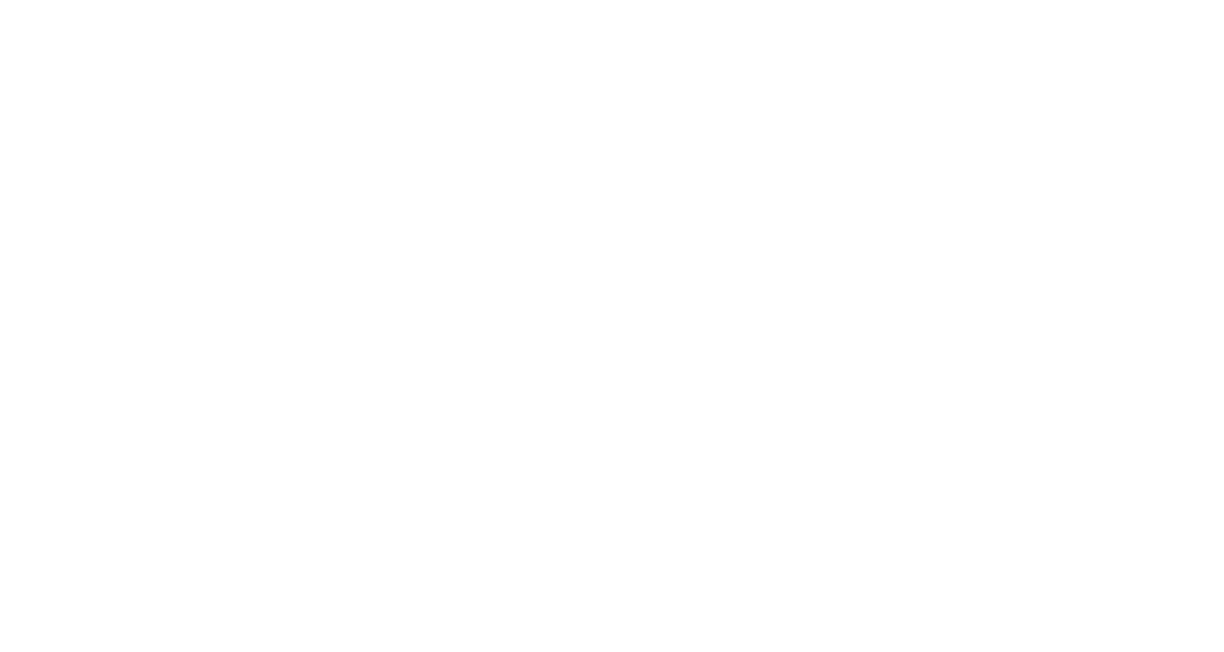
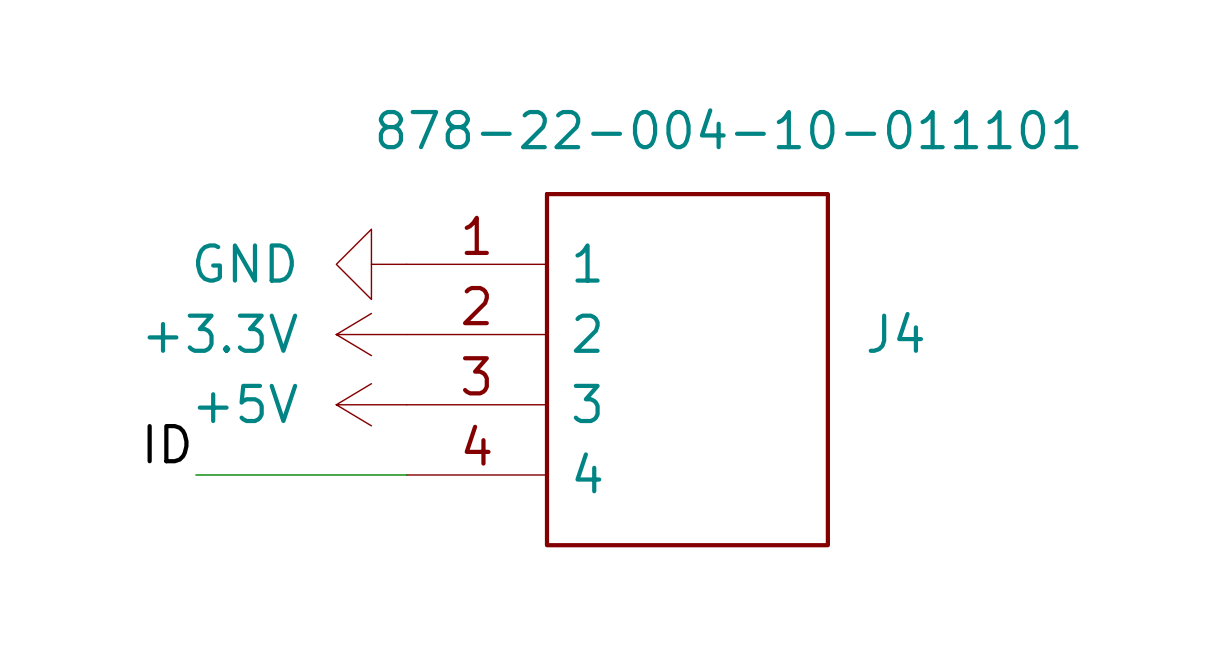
power symbol: none -> GND (371, 264)
power symbol: none -> +3.3V (371, 334)
J4: none -> 878-22-004-10-011101 (618, 369)
power symbol: none -> +5V (371, 404)
label: none -> ID (168, 443)
wire: none -> (195, 474) (406, 474)

